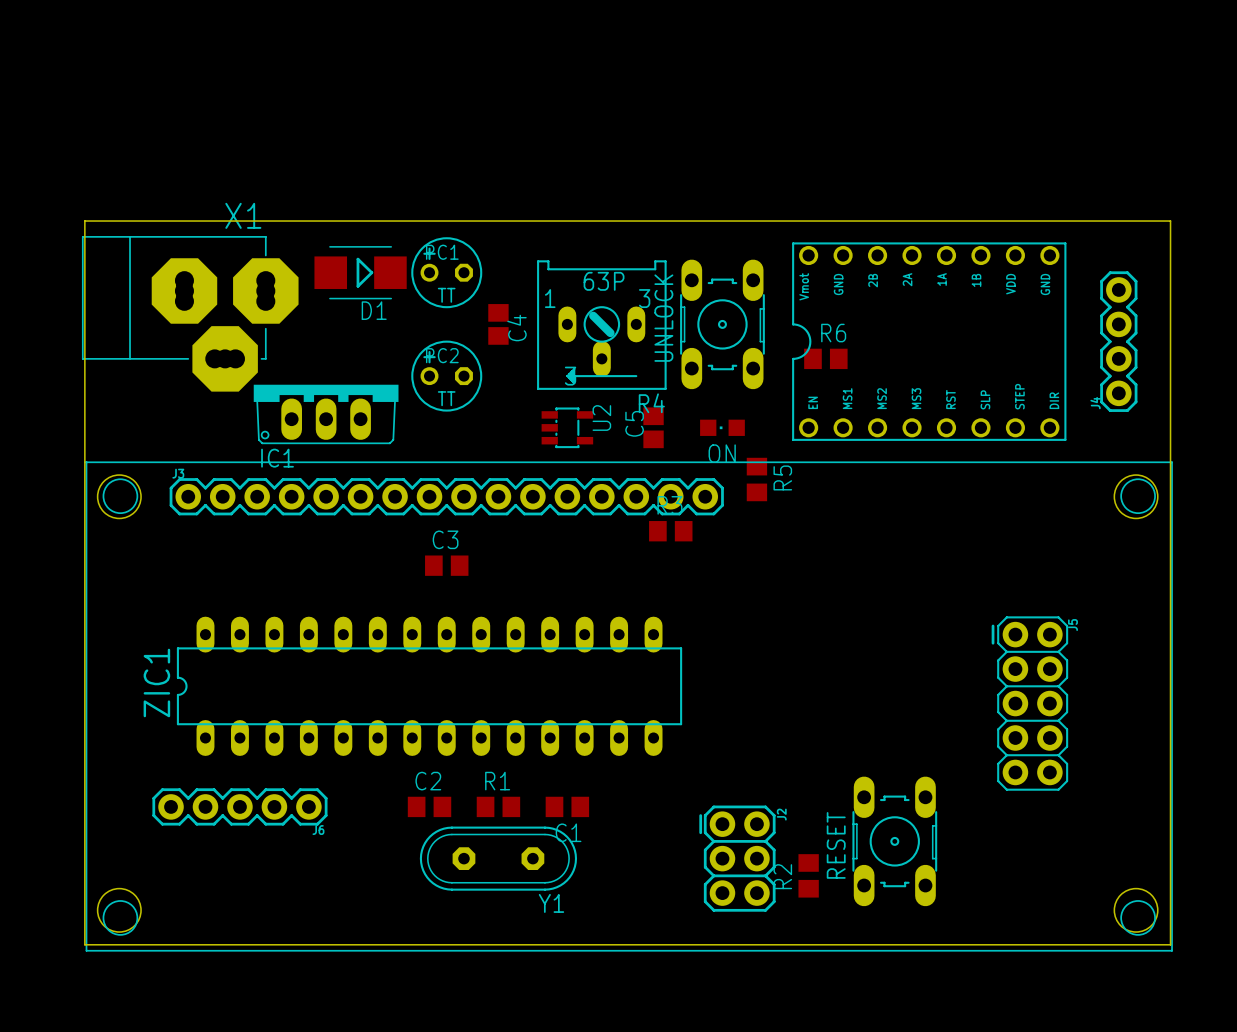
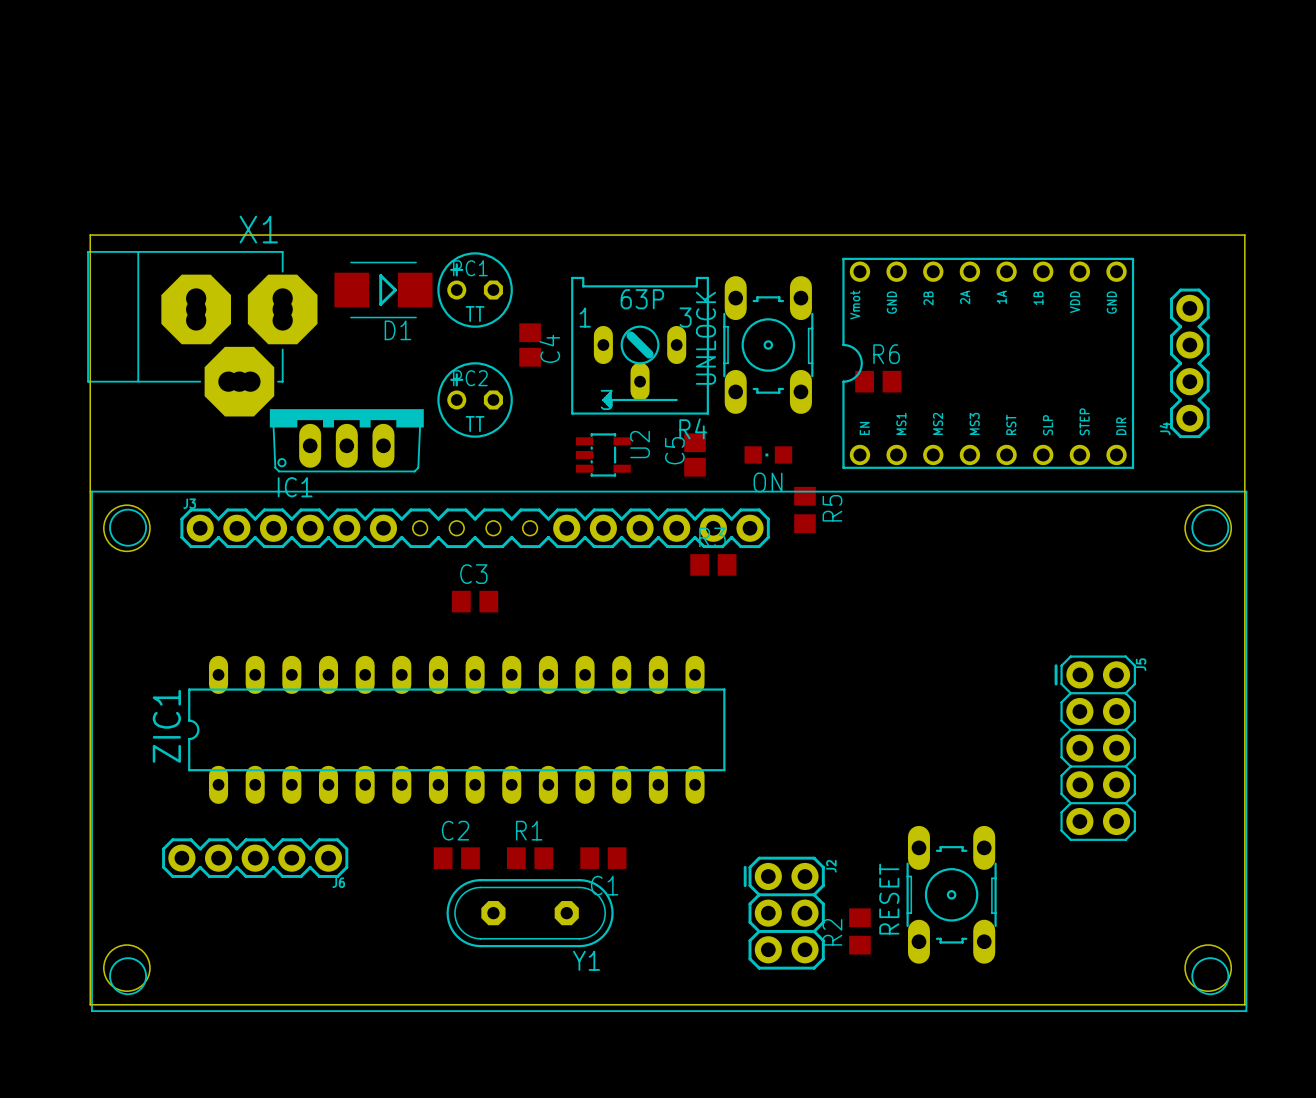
J3 footprint: [84, 461, 1173, 952] -> [89, 490, 1248, 1013]

